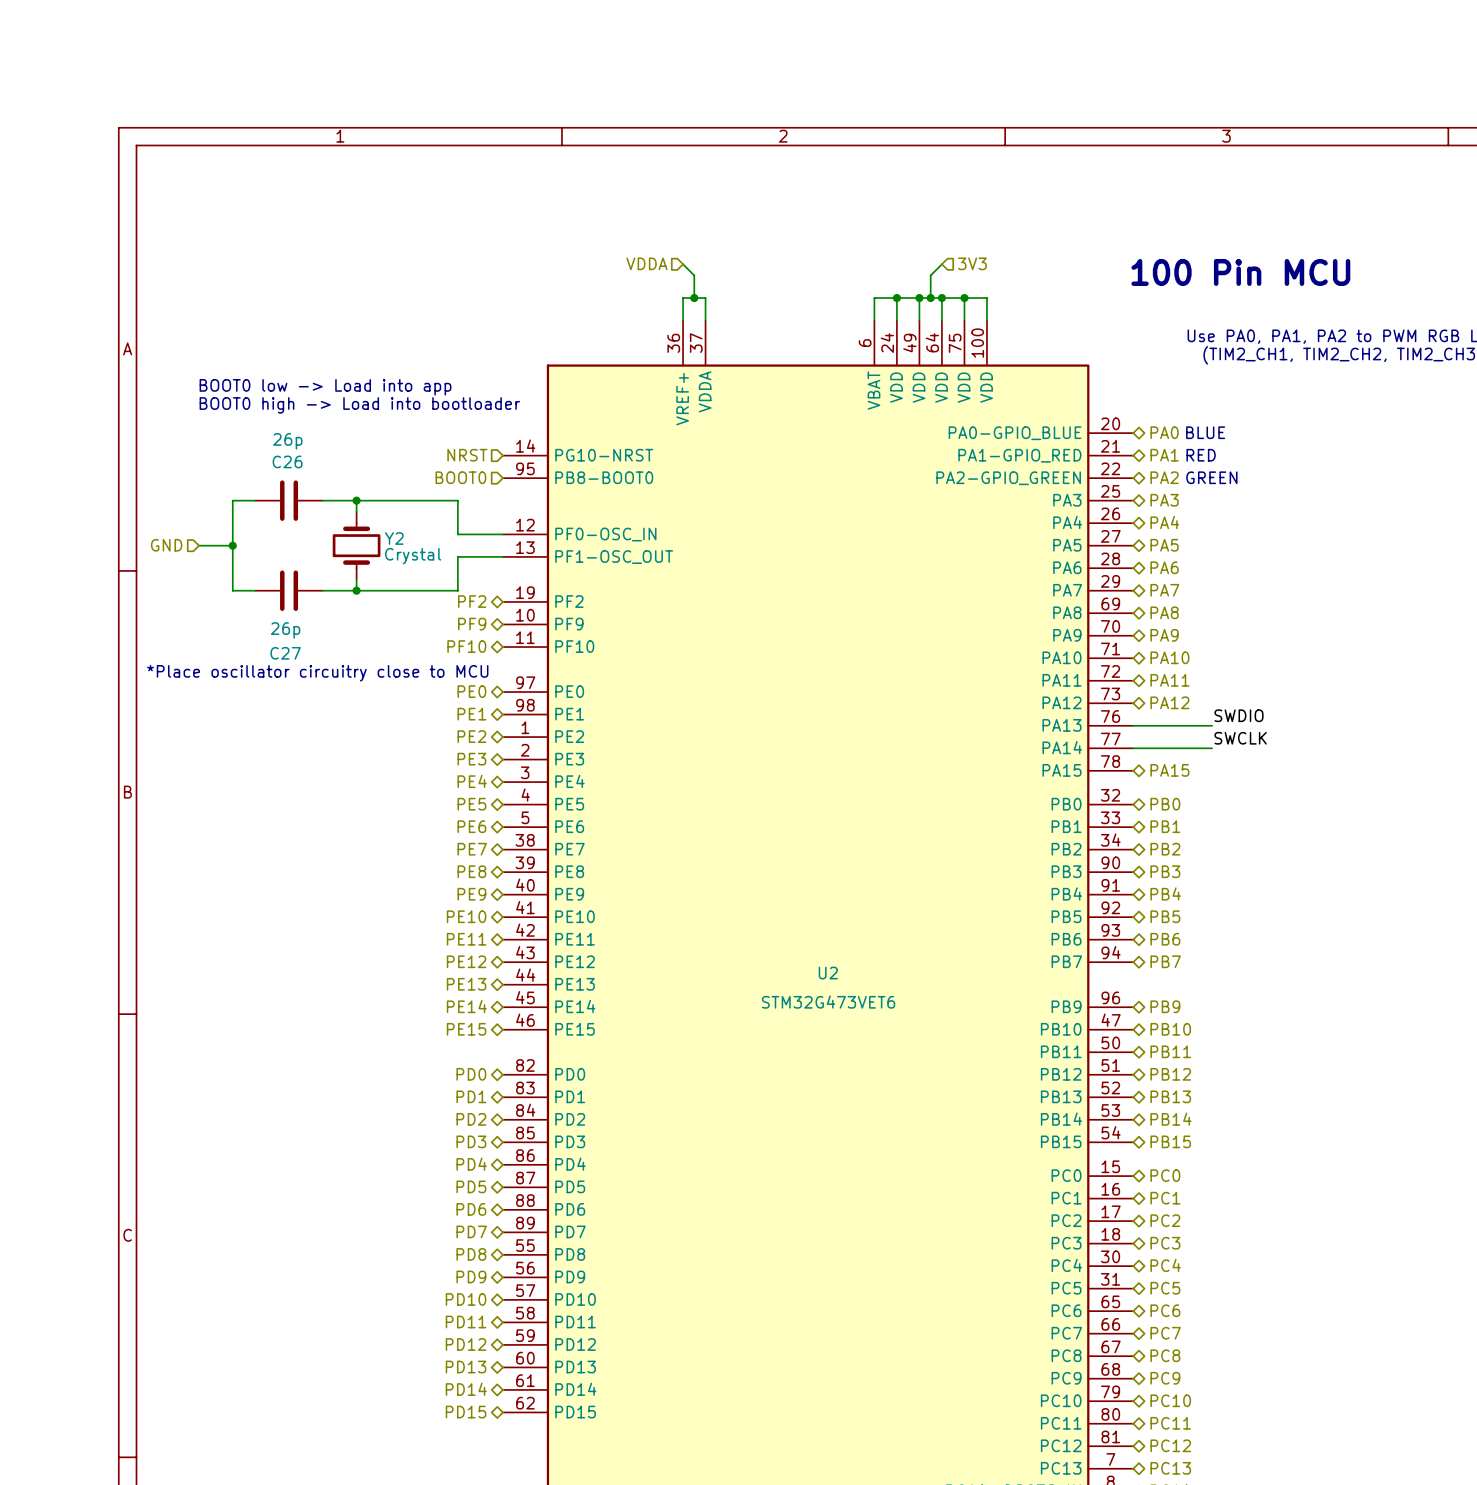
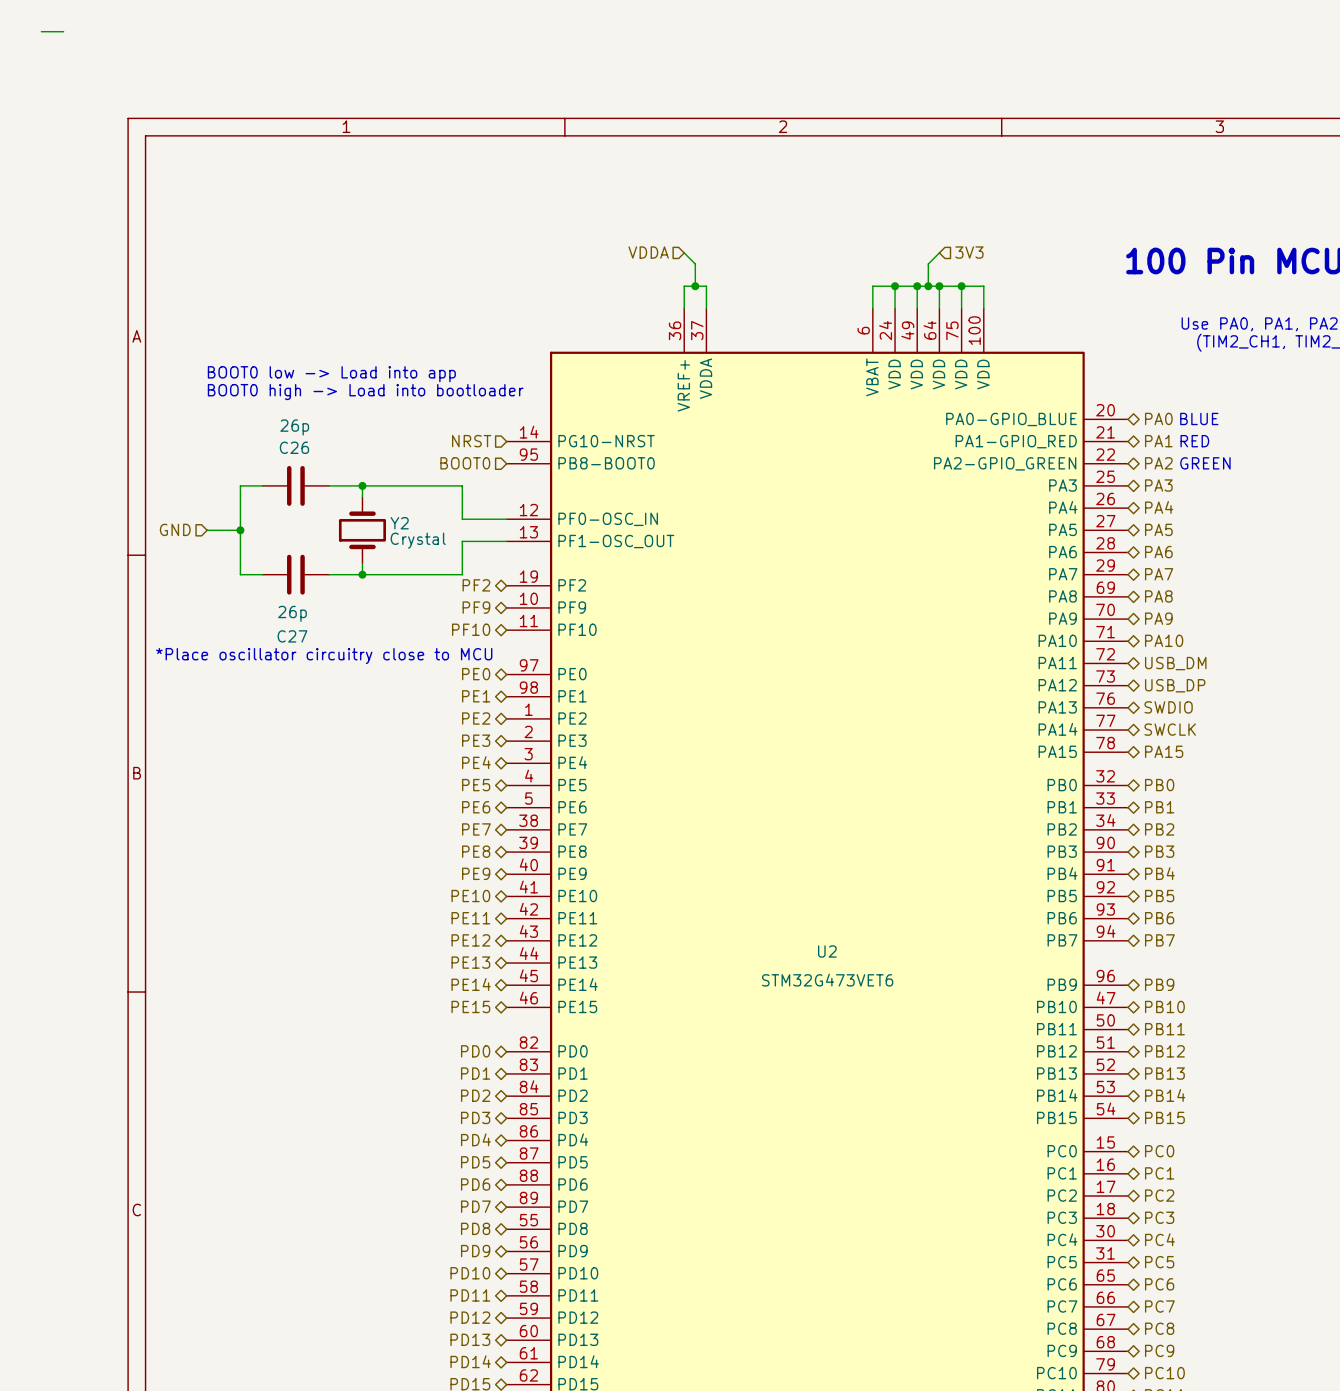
wire: none -> (41, 31) (63, 31)
hierarchical label: PA11 (1169, 680) -> USB_DM (1175, 663)
hierarchical label: PA12 (1169, 702) -> USB_DP (1175, 685)
label: SWDIO (1239, 715) -> none
wire: (1133, 725) (1212, 725) -> none
hierarchical label: none -> SWDIO (1168, 707)
label: SWCLK (1240, 738) -> none
hierarchical label: none -> SWCLK (1170, 729)
wire: (1133, 748) (1212, 748) -> none

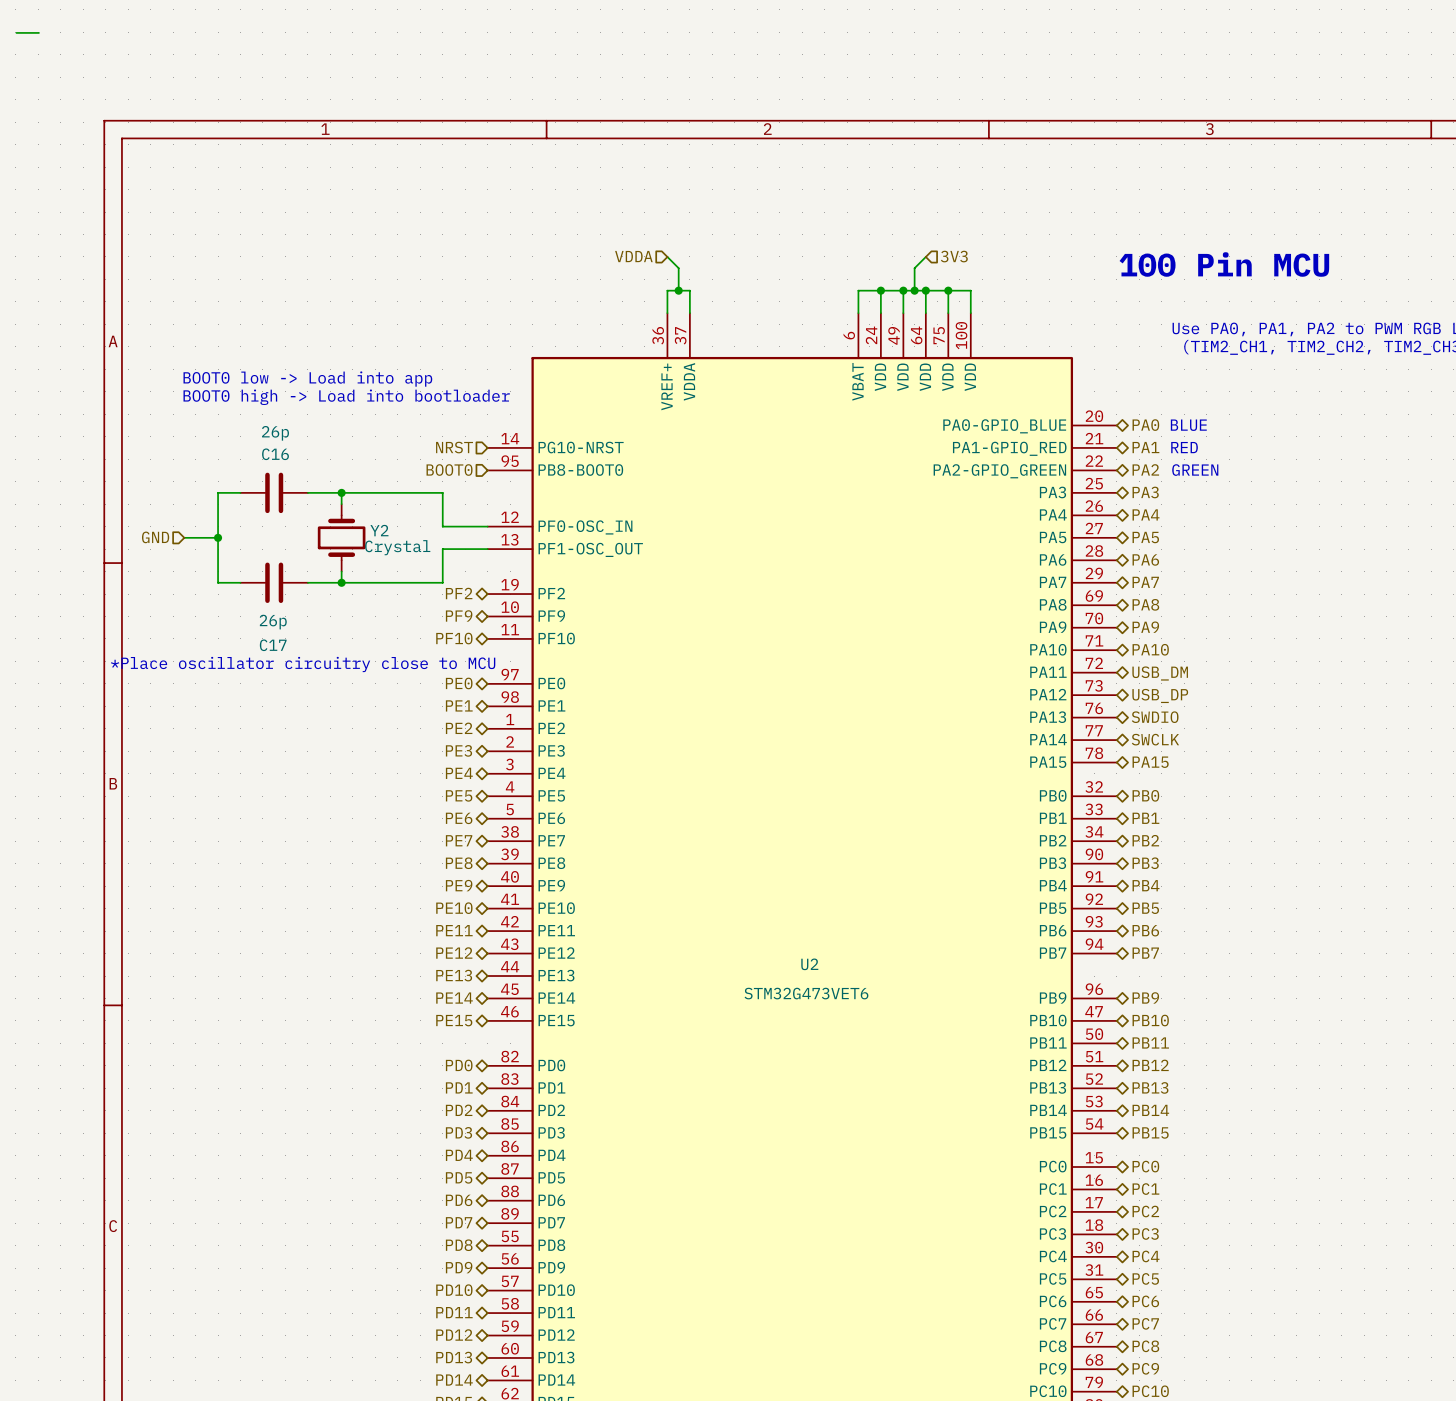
C26 name: C26 (294, 447) -> C16 (275, 454)
C27 name: C27 (292, 636) -> C17 (273, 645)

